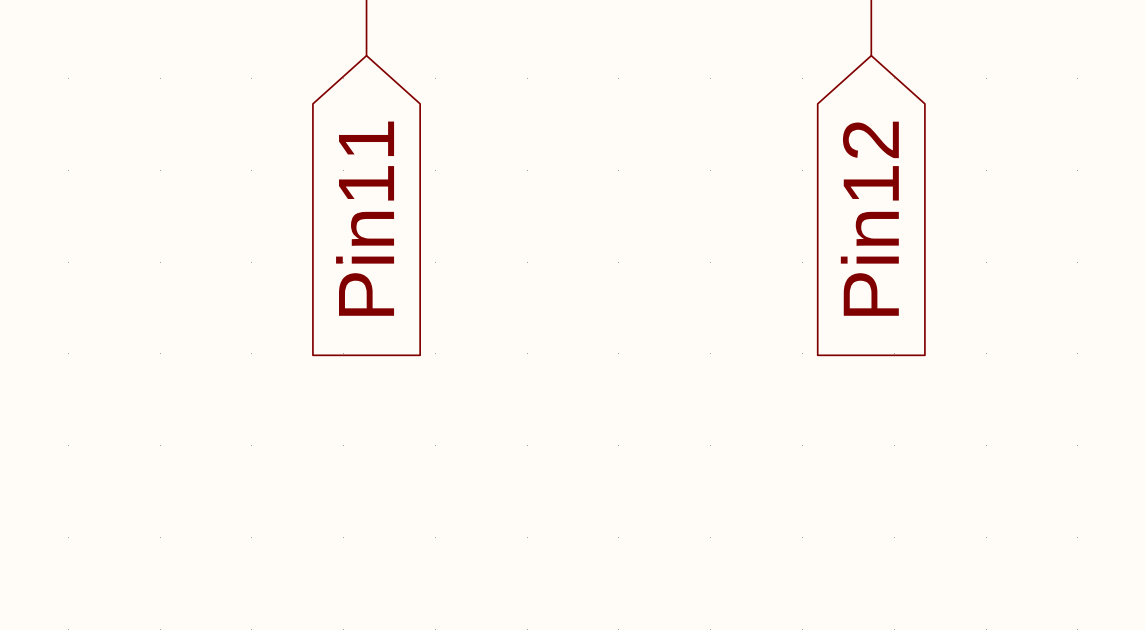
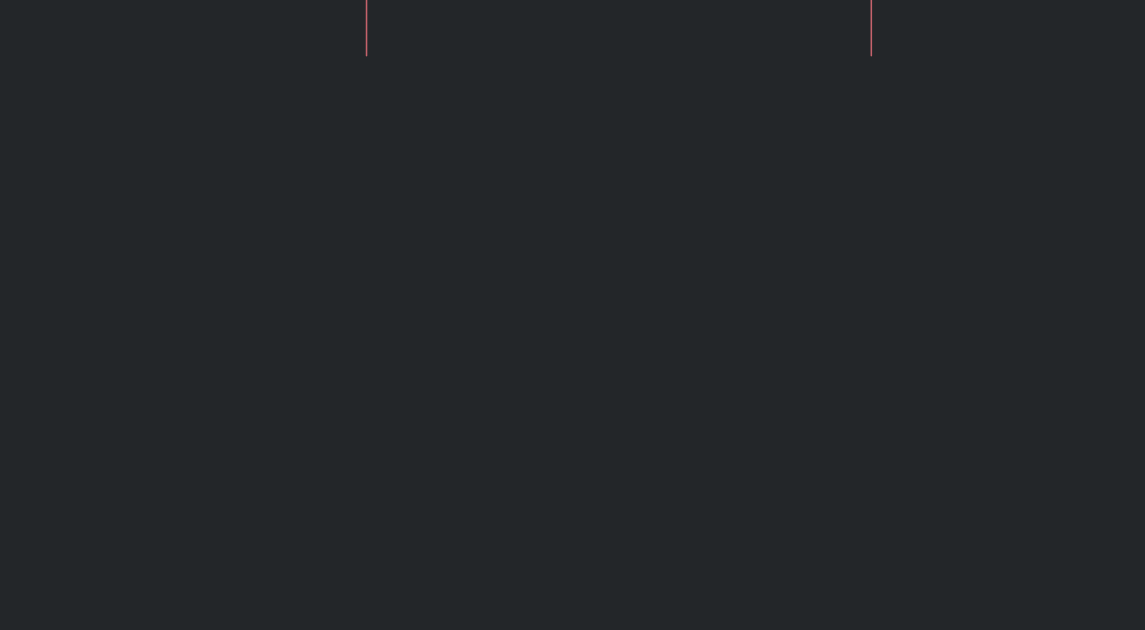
global label: Pin11 (365, 218) -> none
global label: Pin12 (869, 218) -> none

